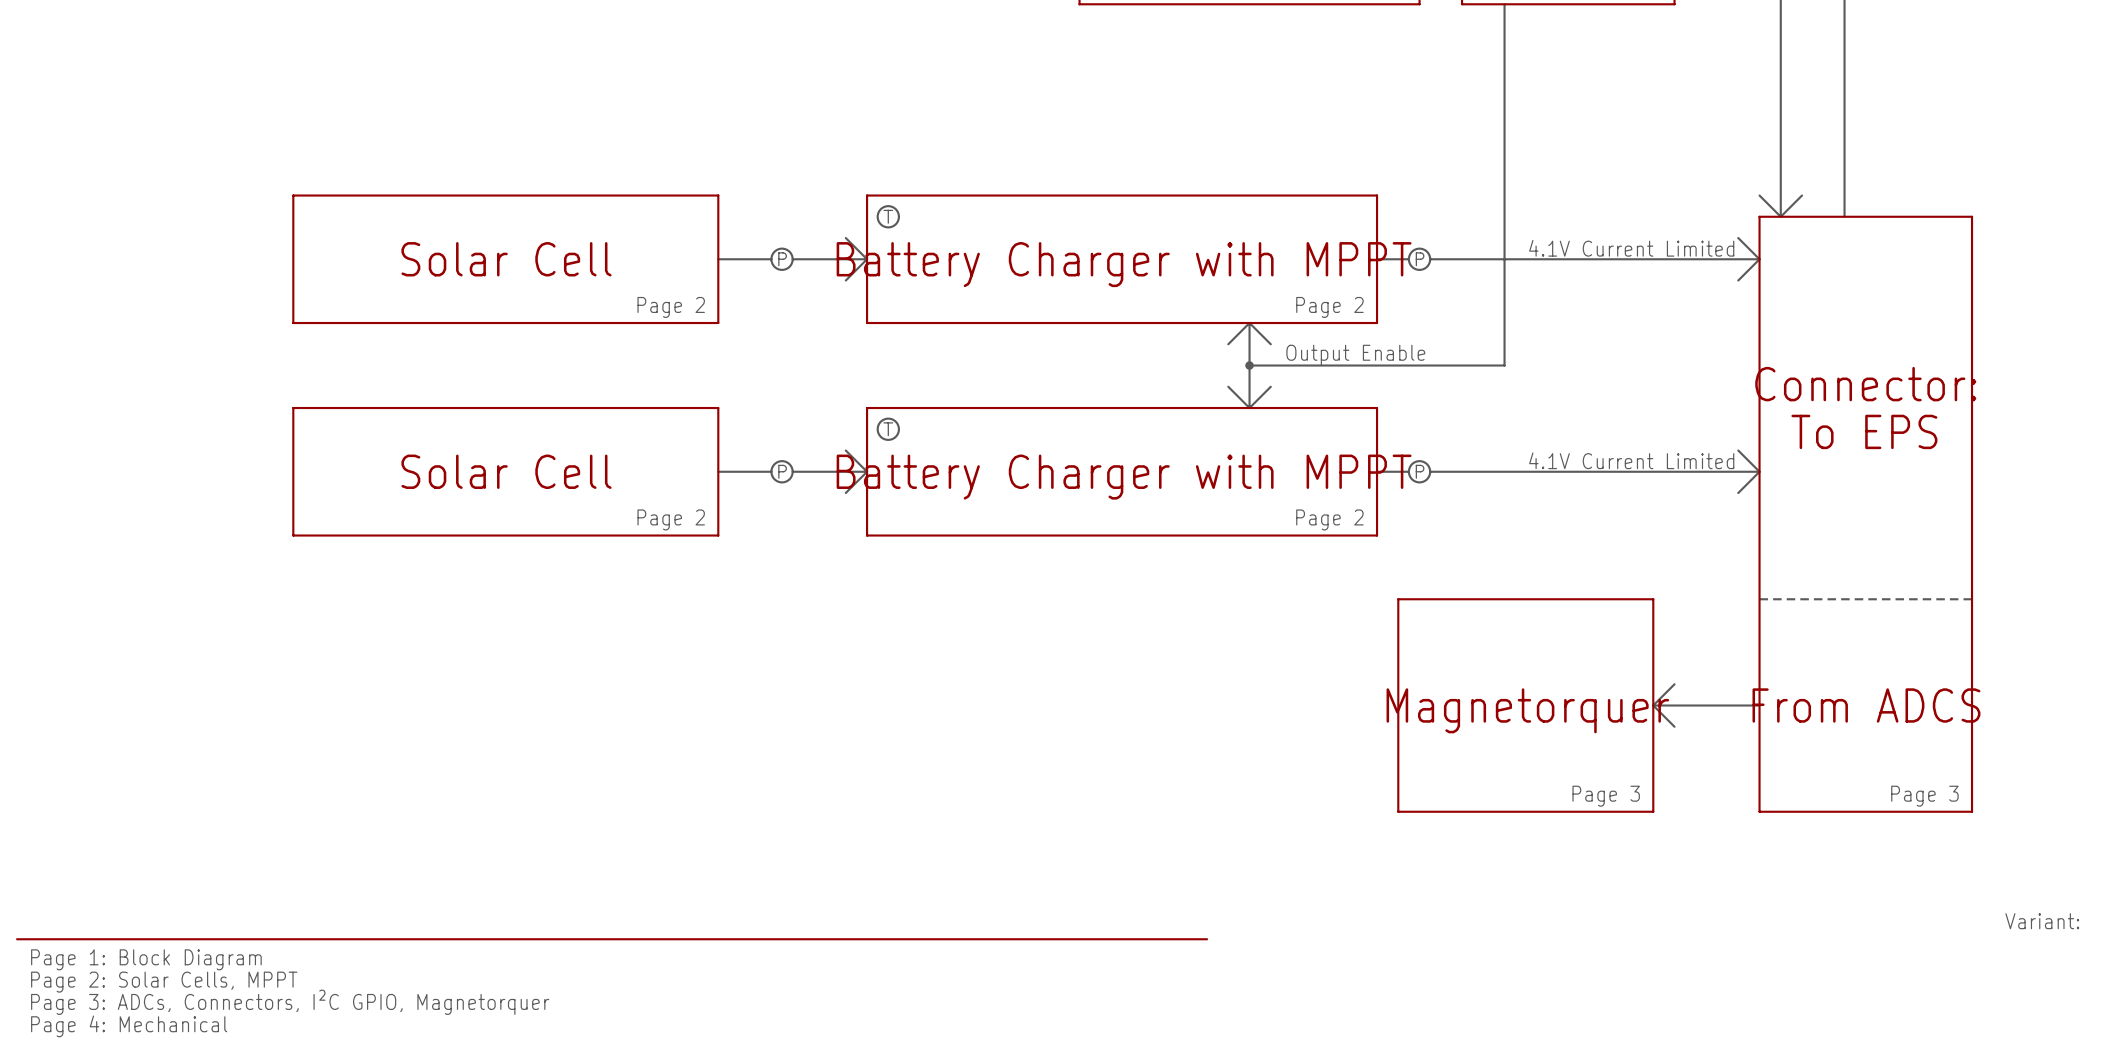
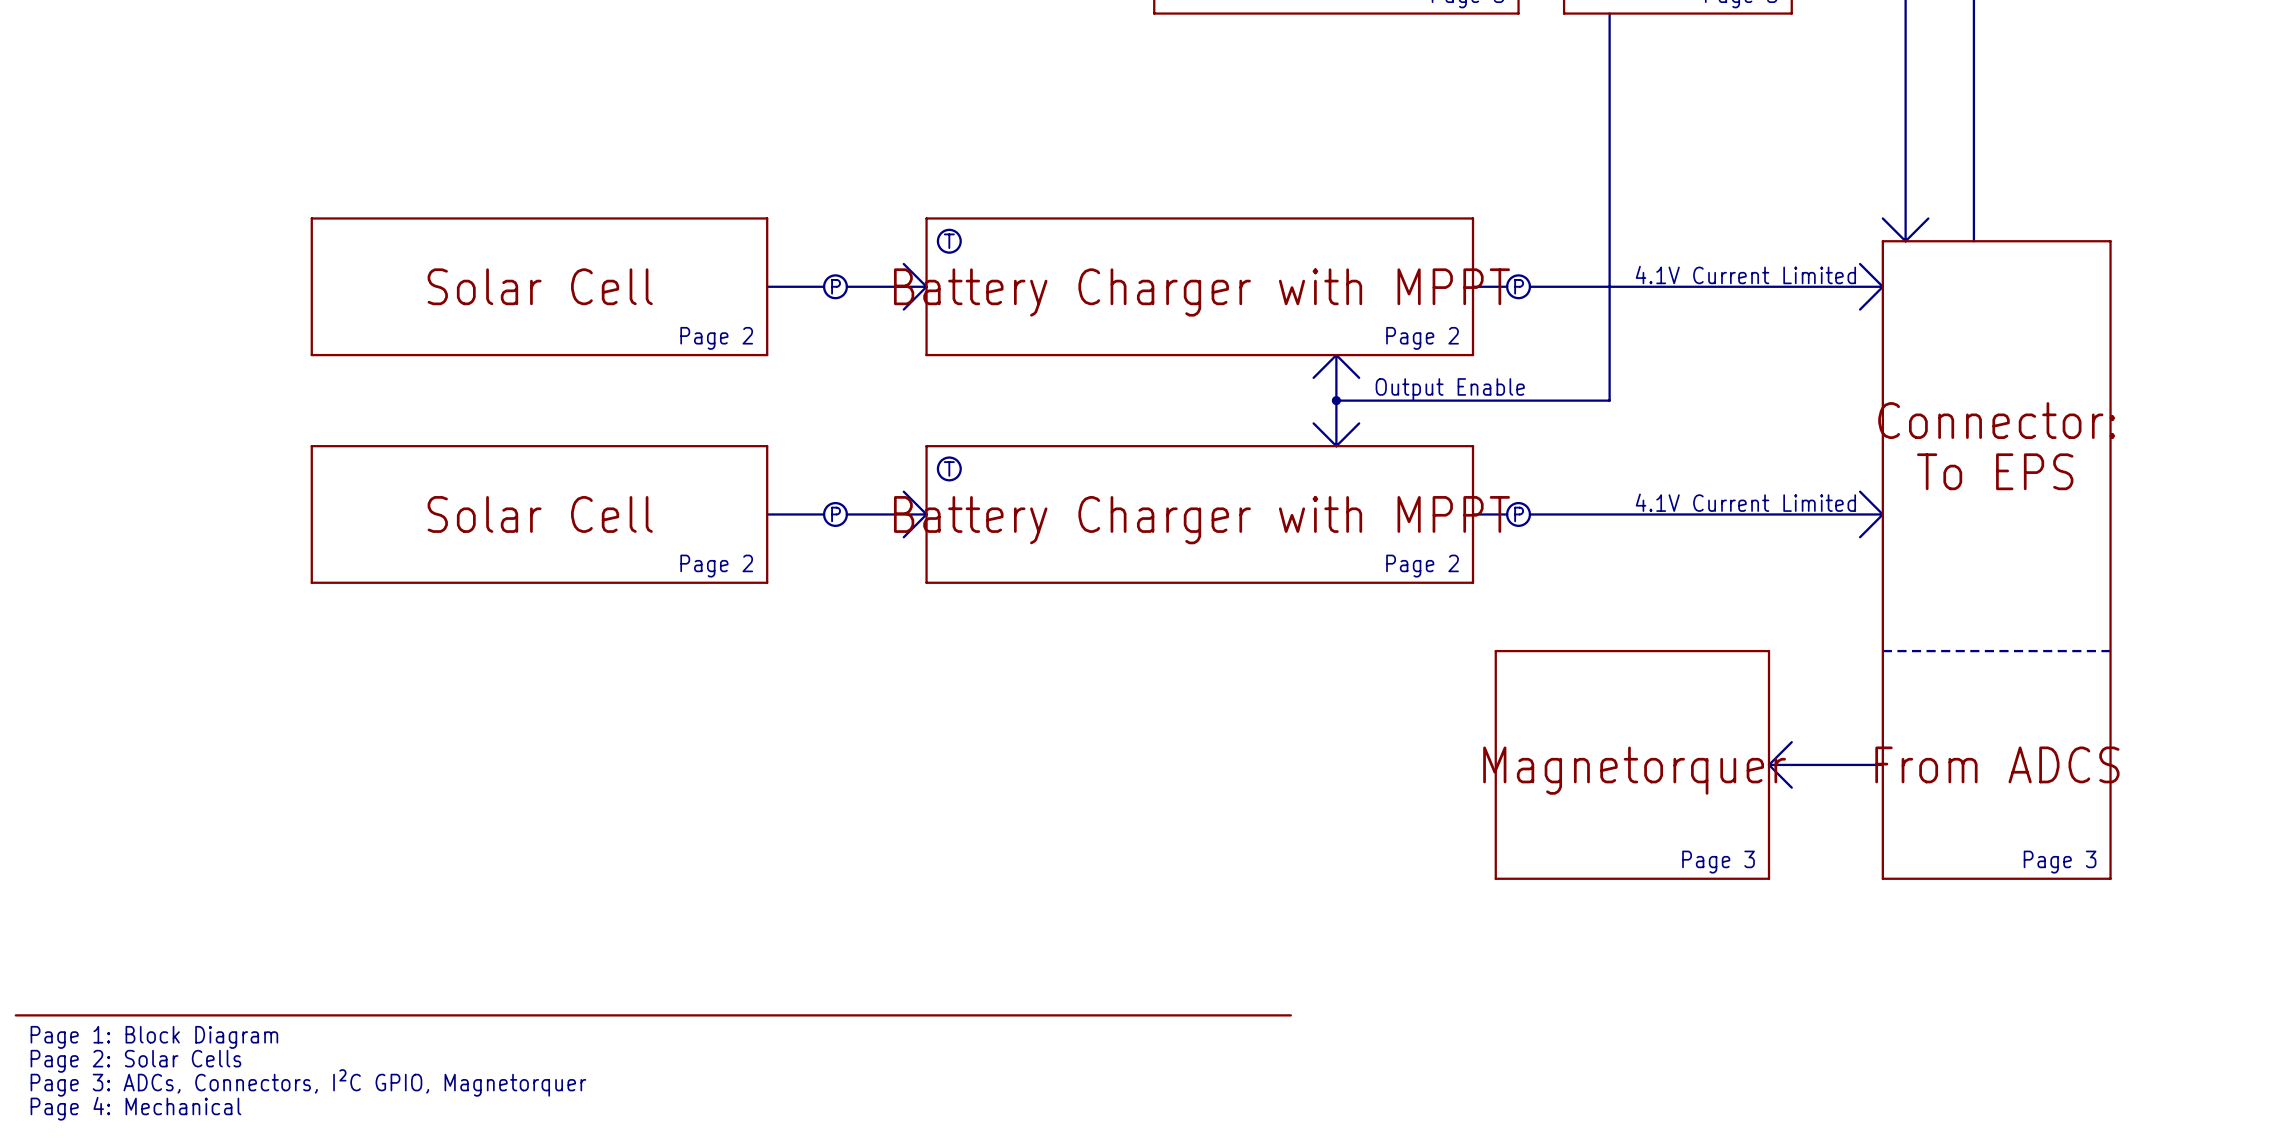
text: Variant: (2042, 921) -> none
text: Page 2: Solar Cells, MPPT (164, 982) -> Page 2: Solar Cells (135, 1061)

